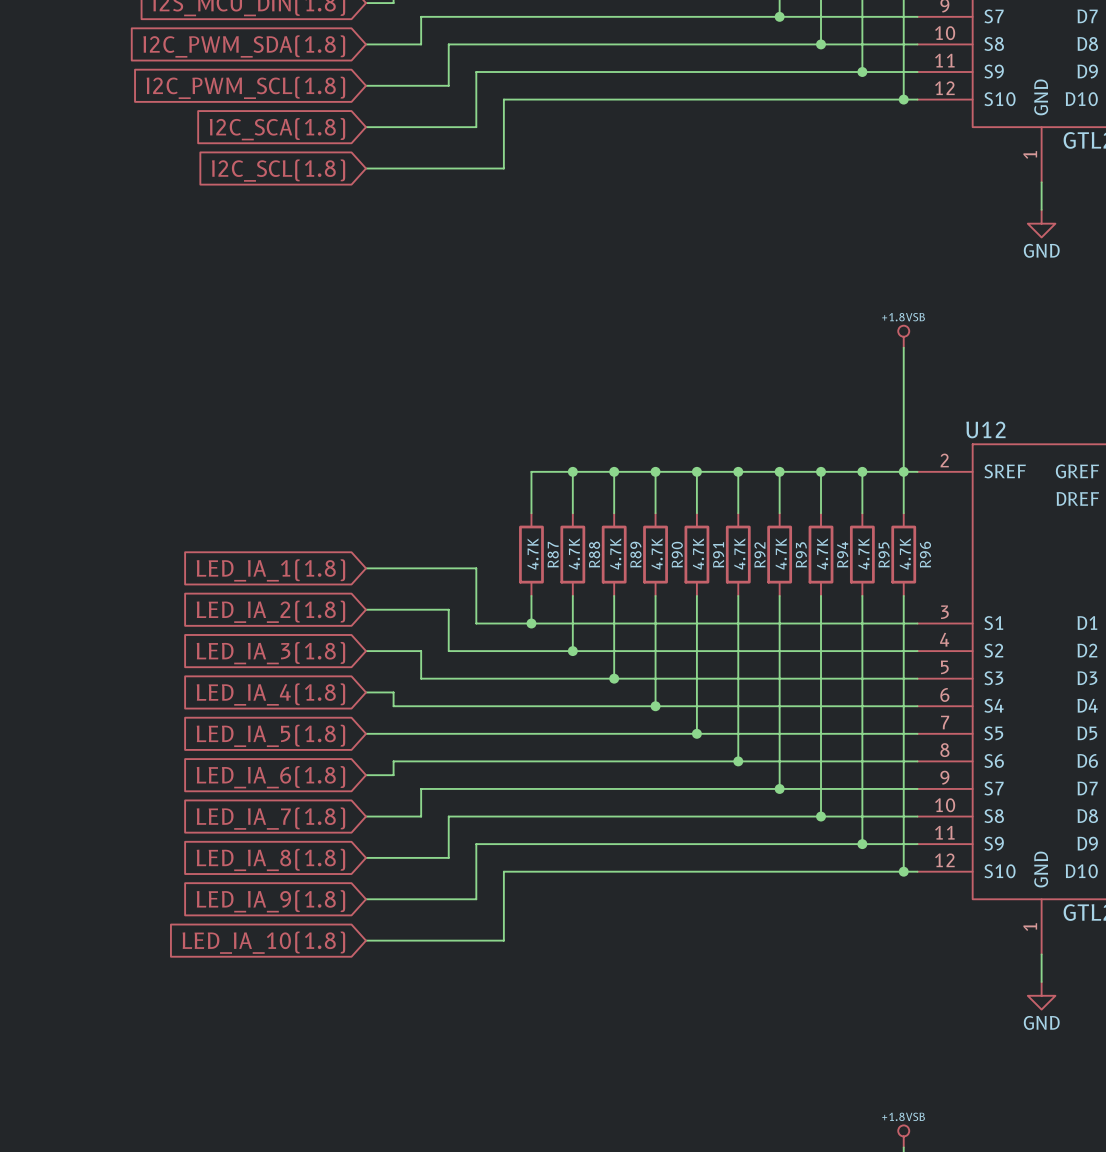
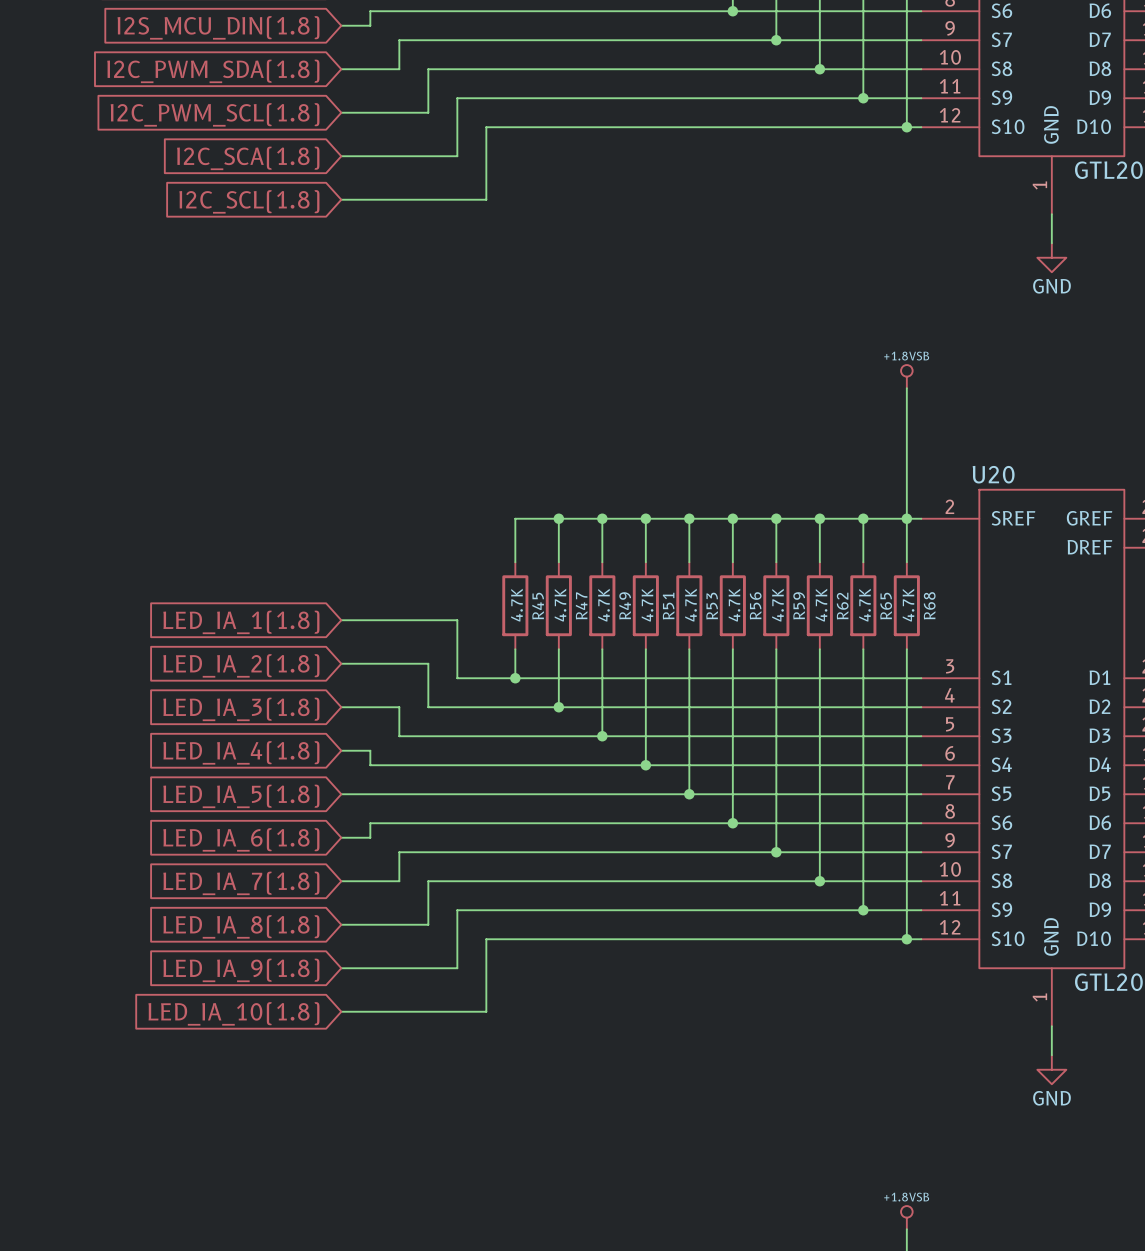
U12 name: U12 (985, 429) -> U20 (993, 474)
R87 name: R87 (553, 554) -> R45 (538, 606)
R88 name: R88 (594, 554) -> R47 (581, 605)
R89 name: R89 (635, 554) -> R49 (625, 605)
R90 name: R90 (677, 554) -> R51 (668, 606)
R91 name: R91 (718, 554) -> R53 (712, 606)
R92 name: R92 (760, 554) -> R56 (755, 605)
R93 name: R93 (801, 554) -> R59 (799, 605)
R94 name: R94 (842, 554) -> R62 (842, 606)
R95 name: R95 (884, 554) -> R65 (886, 606)
R96 name: R96 (925, 554) -> R68 (929, 605)

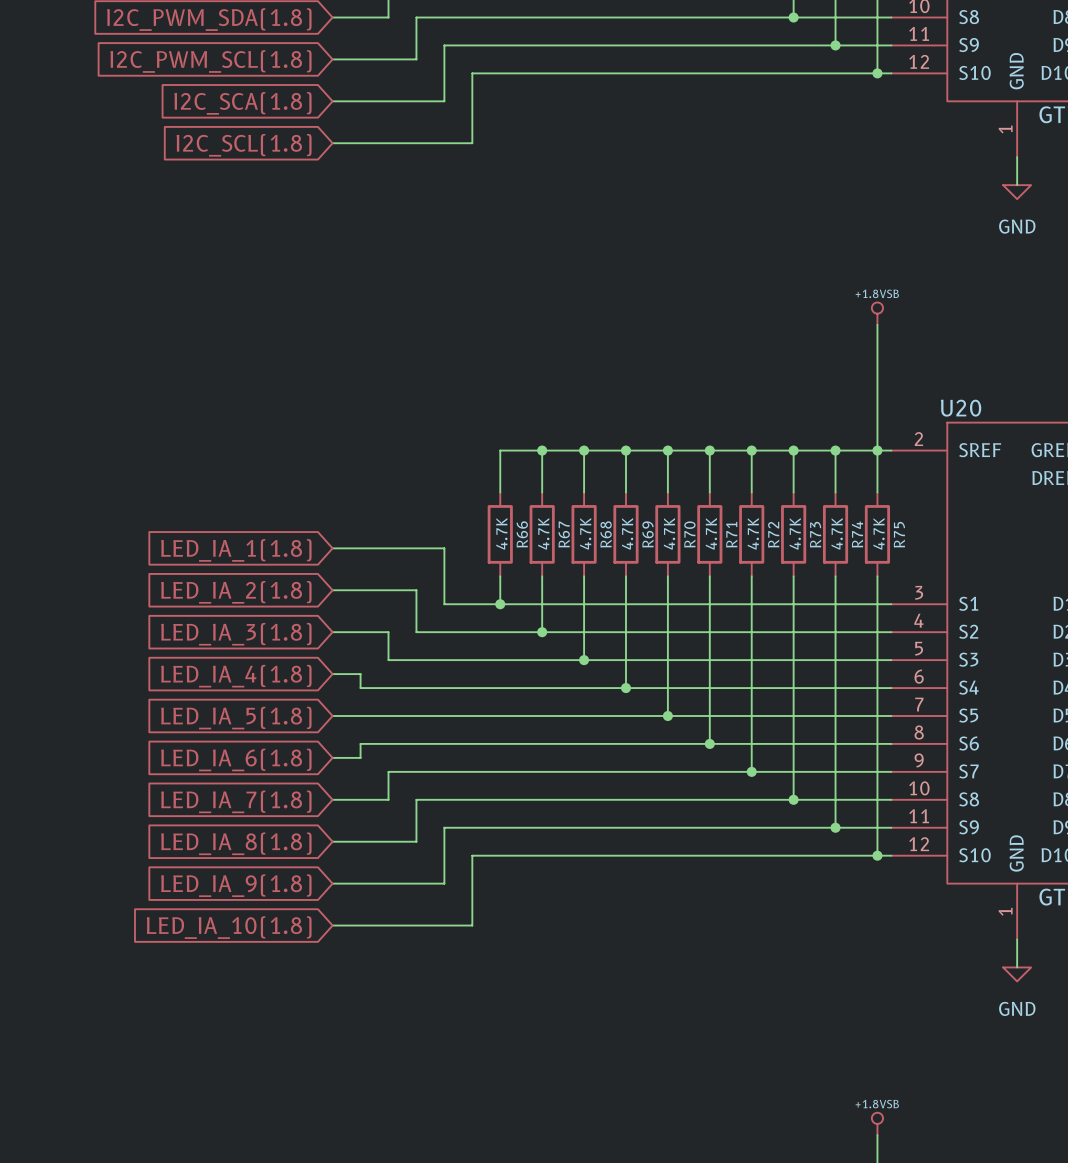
power symbol shape: [1037, 243, 1067, 273] -> [1003, 185, 1032, 200]
R47 name: R47 (581, 605) -> R67 (564, 534)
R49 name: R49 (625, 605) -> R68 (606, 534)
R56 name: R56 (755, 605) -> R71 (731, 534)
R59 name: R59 (799, 605) -> R72 (773, 534)
R68 name: R68 (929, 605) -> R75 (899, 534)
R45 name: R45 (538, 606) -> R66 (522, 534)
R51 name: R51 (668, 606) -> R69 (648, 534)
R53 name: R53 (712, 606) -> R70 (689, 534)
R62 name: R62 (842, 606) -> R73 (815, 534)
R65 name: R65 (886, 606) -> R74 (857, 534)
power symbol shape: [1037, 1055, 1067, 1085] -> [1003, 967, 1032, 982]

